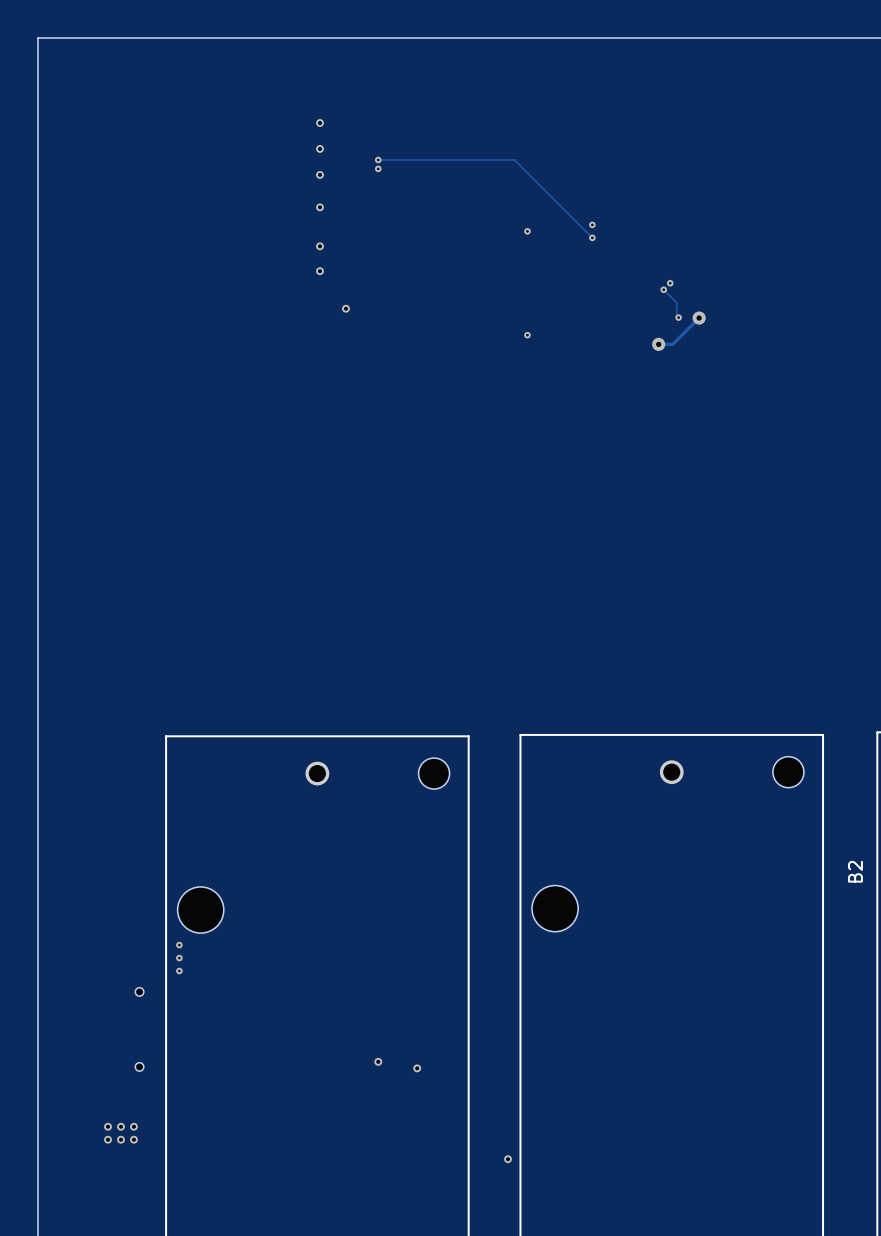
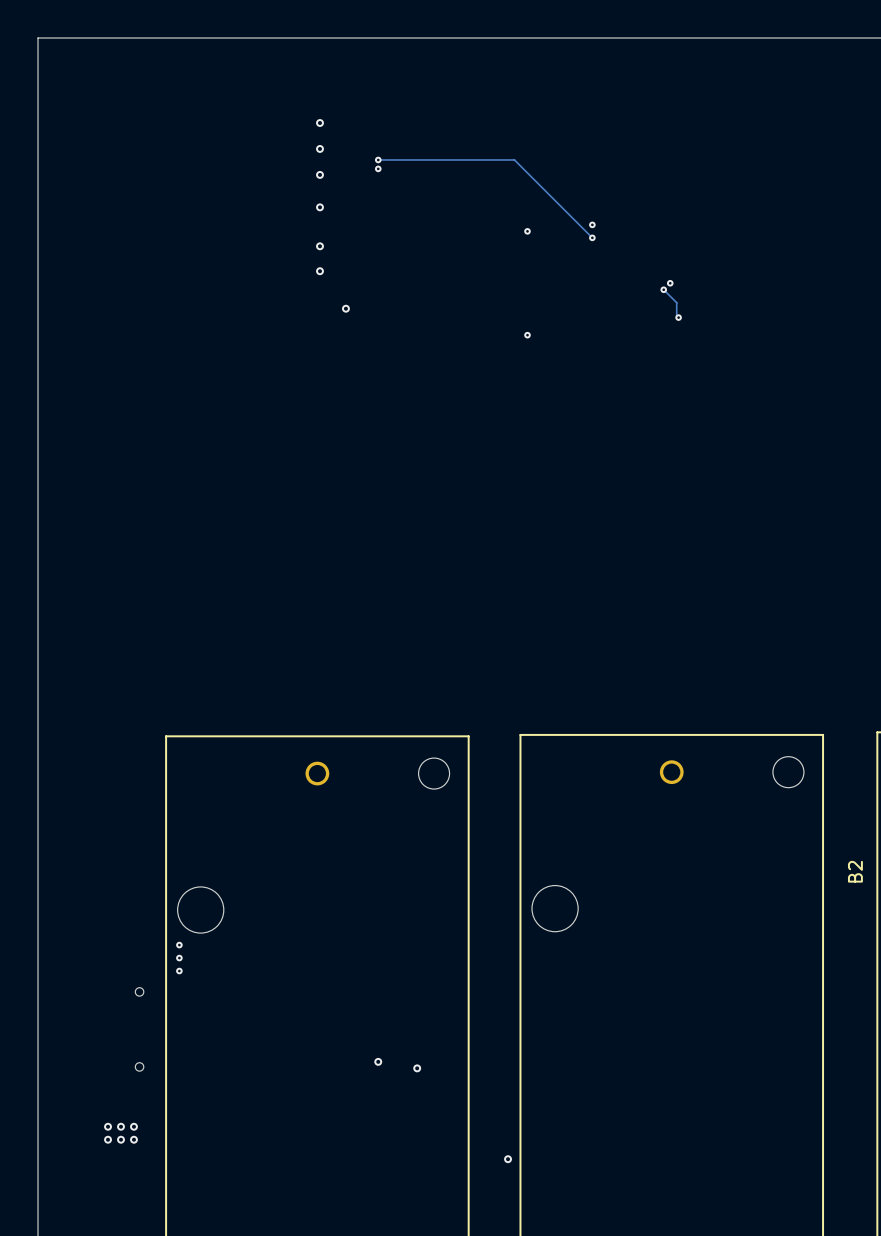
track: (699, 318) (672, 344) (658, 344) -> none
via: (699, 318) -> none
via: (658, 344) -> none

